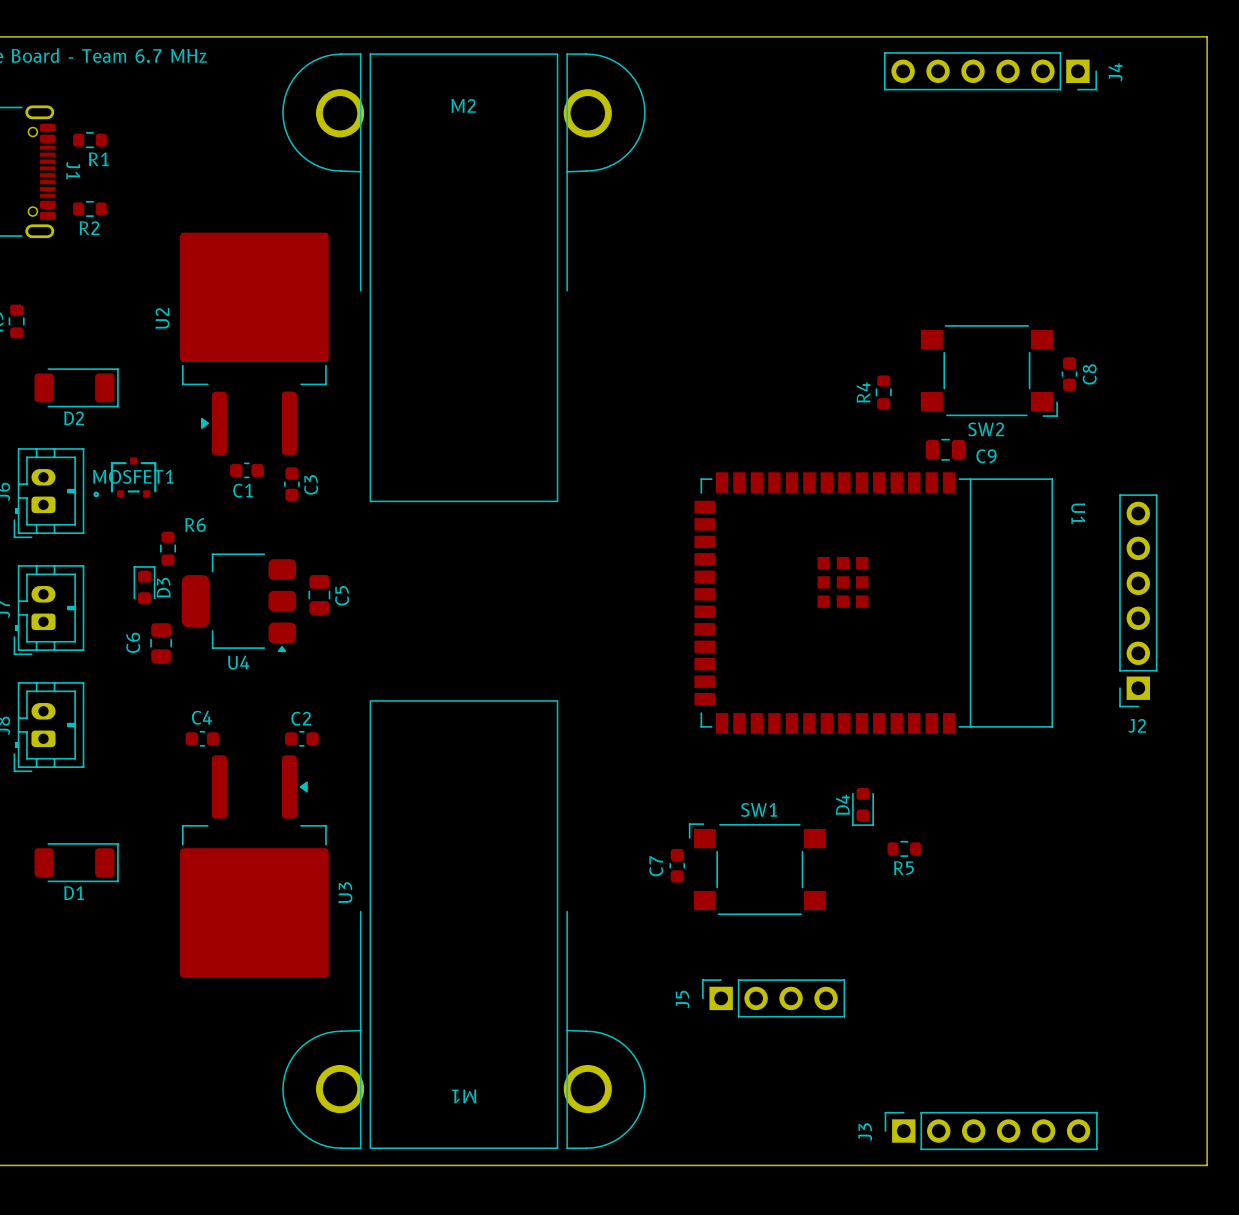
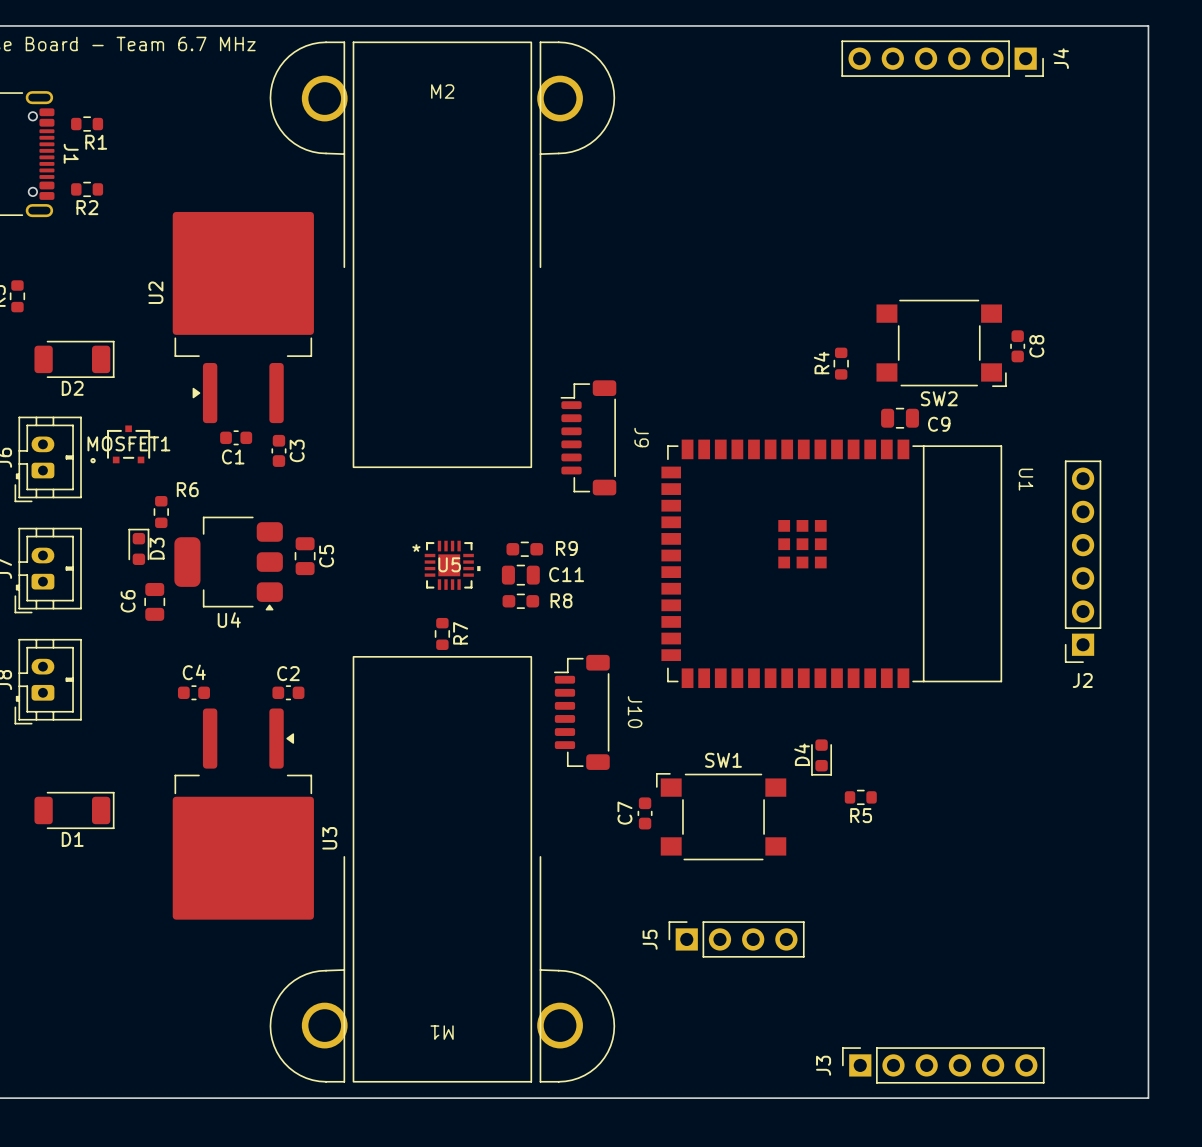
J9: none -> (588, 437)
R9: none -> (524, 549)
U5: none -> (452, 565)
C11: none -> (520, 575)
R8: none -> (520, 601)
R7: none -> (442, 633)
J10: none -> (581, 712)

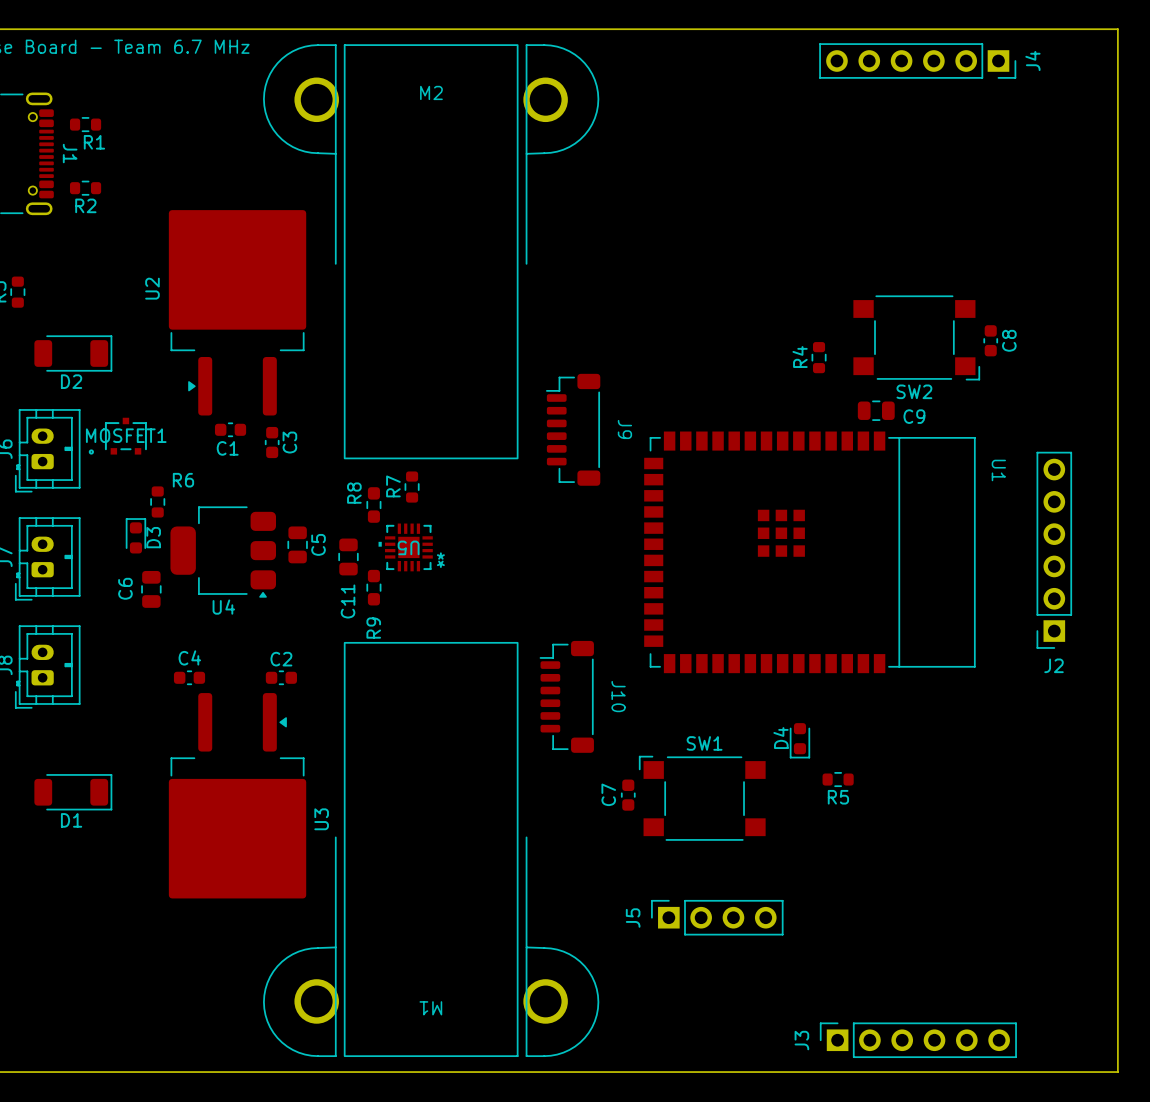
R9 rotation: 0° (524, 549) -> 90° clockwise (373, 587)
R9 position: (524, 549) -> (373, 587)
U5 rotation: 0° (452, 565) -> 180° (405, 547)
U5 position: (452, 565) -> (405, 547)
C11 rotation: 0° (520, 575) -> 90° clockwise (348, 556)
C11 position: (520, 575) -> (348, 556)
R8 name position: R8 (561, 600) -> R8 (354, 493)
R8 rotation: 0° (520, 601) -> 90° clockwise (373, 504)
R8 position: (520, 601) -> (373, 504)
R7 position: (442, 633) -> (412, 487)
R7 name position: R7 (460, 633) -> R7 (393, 486)

